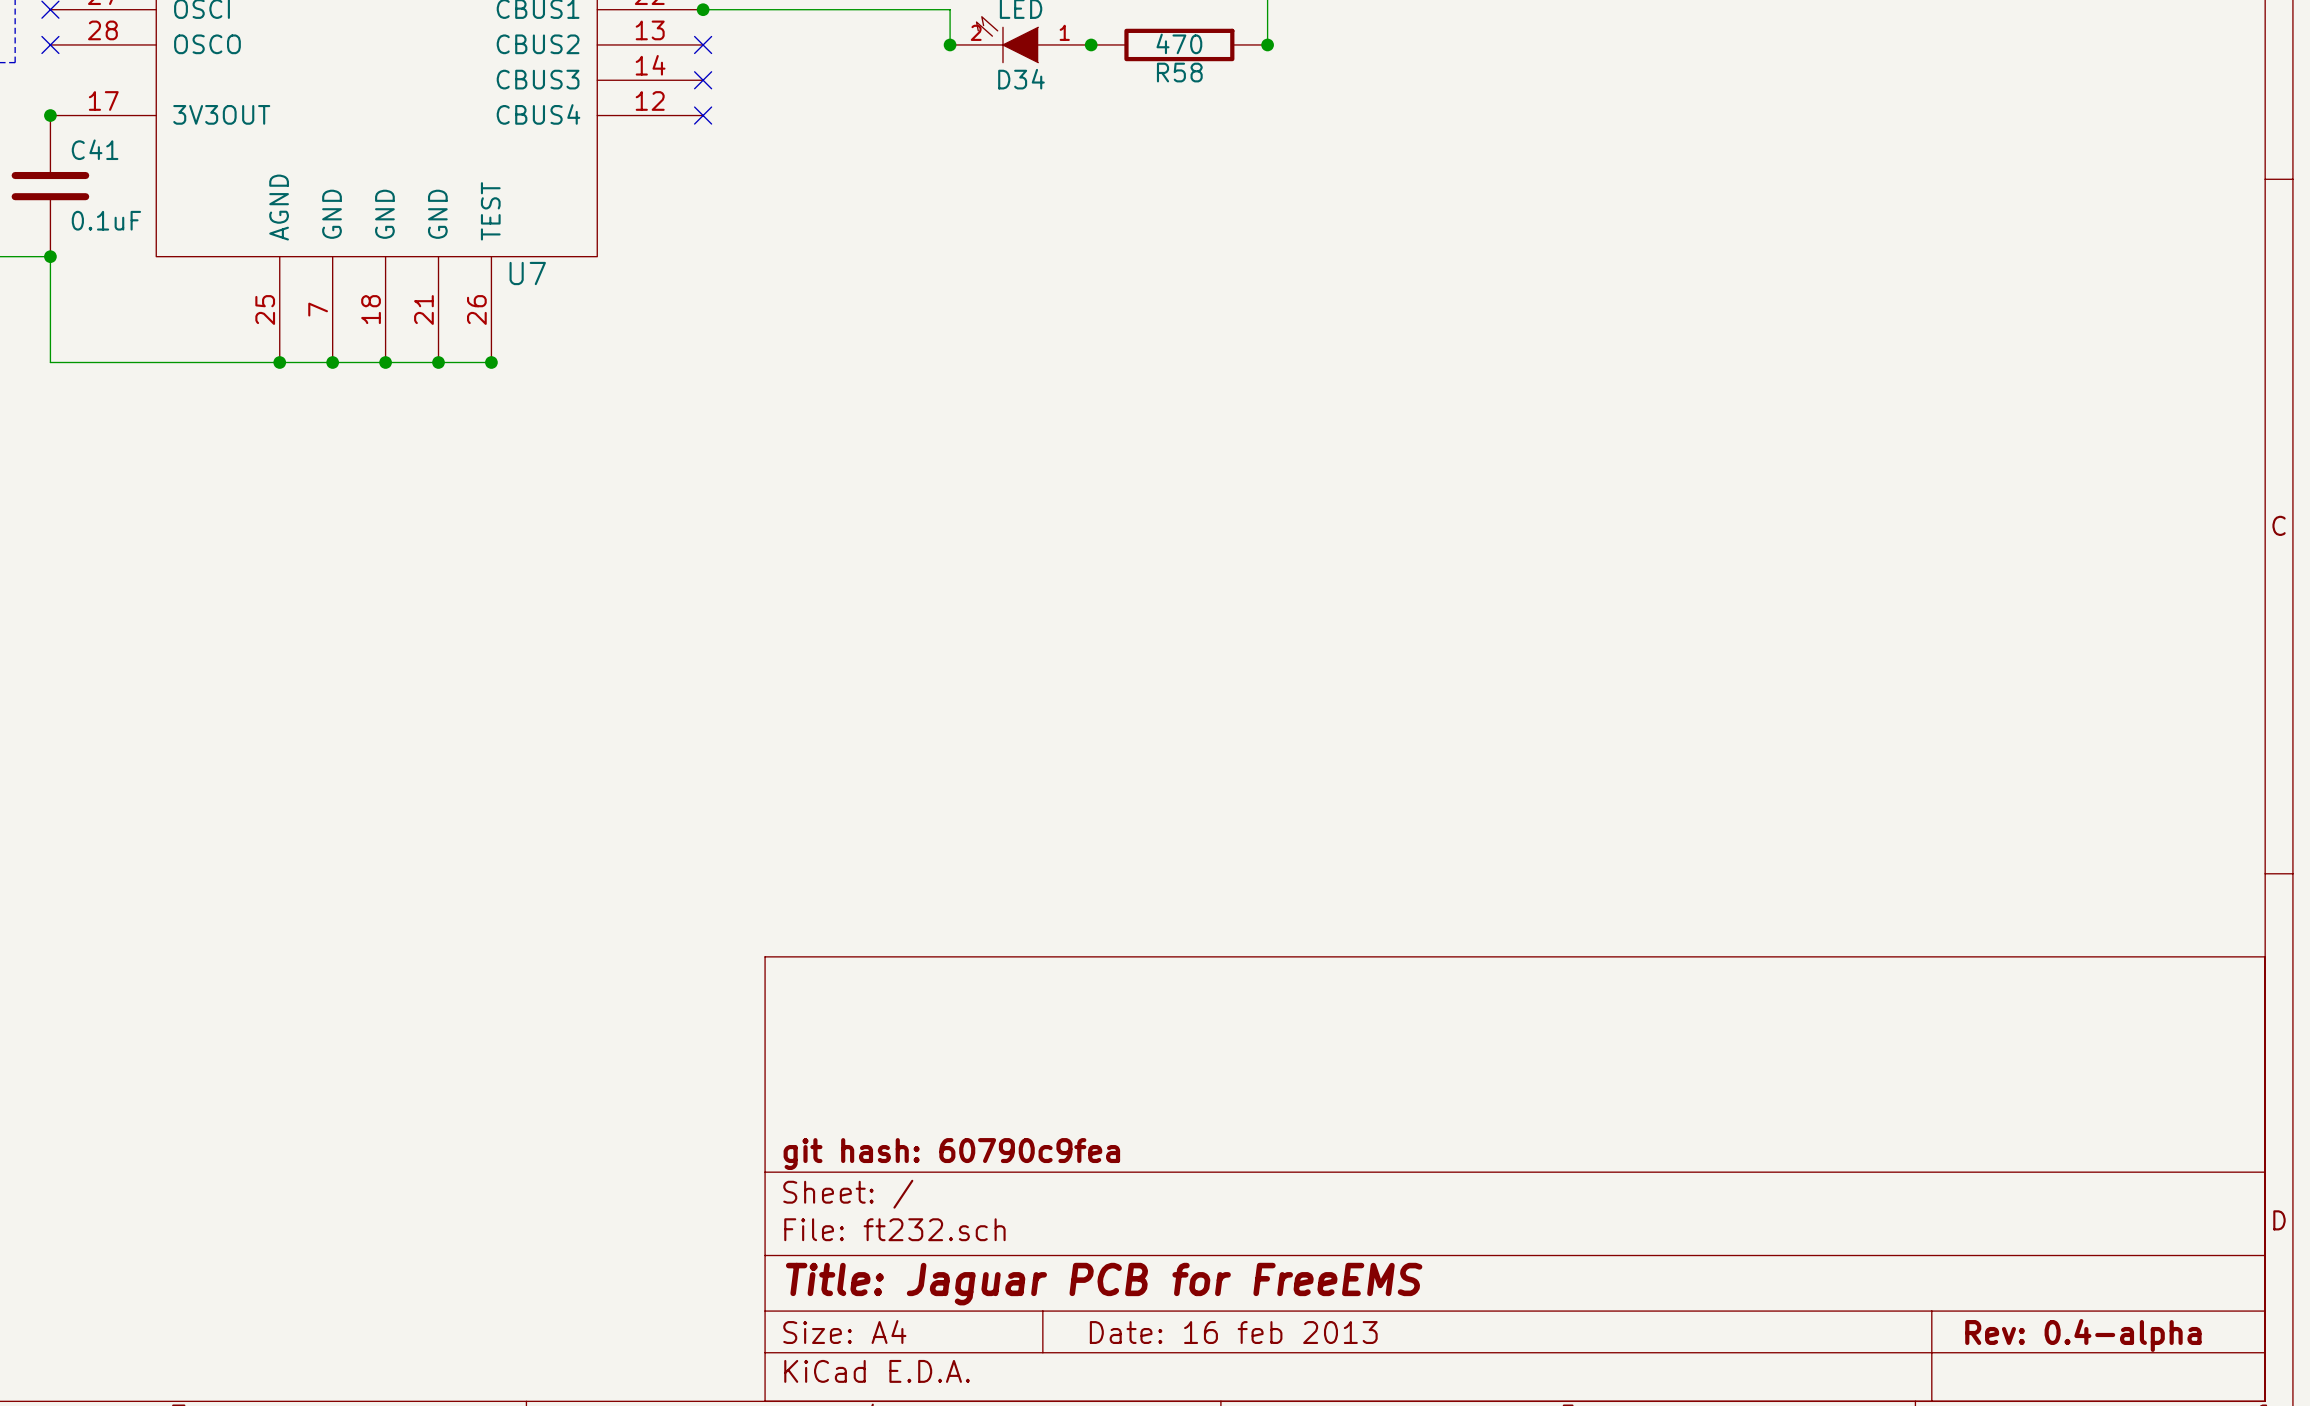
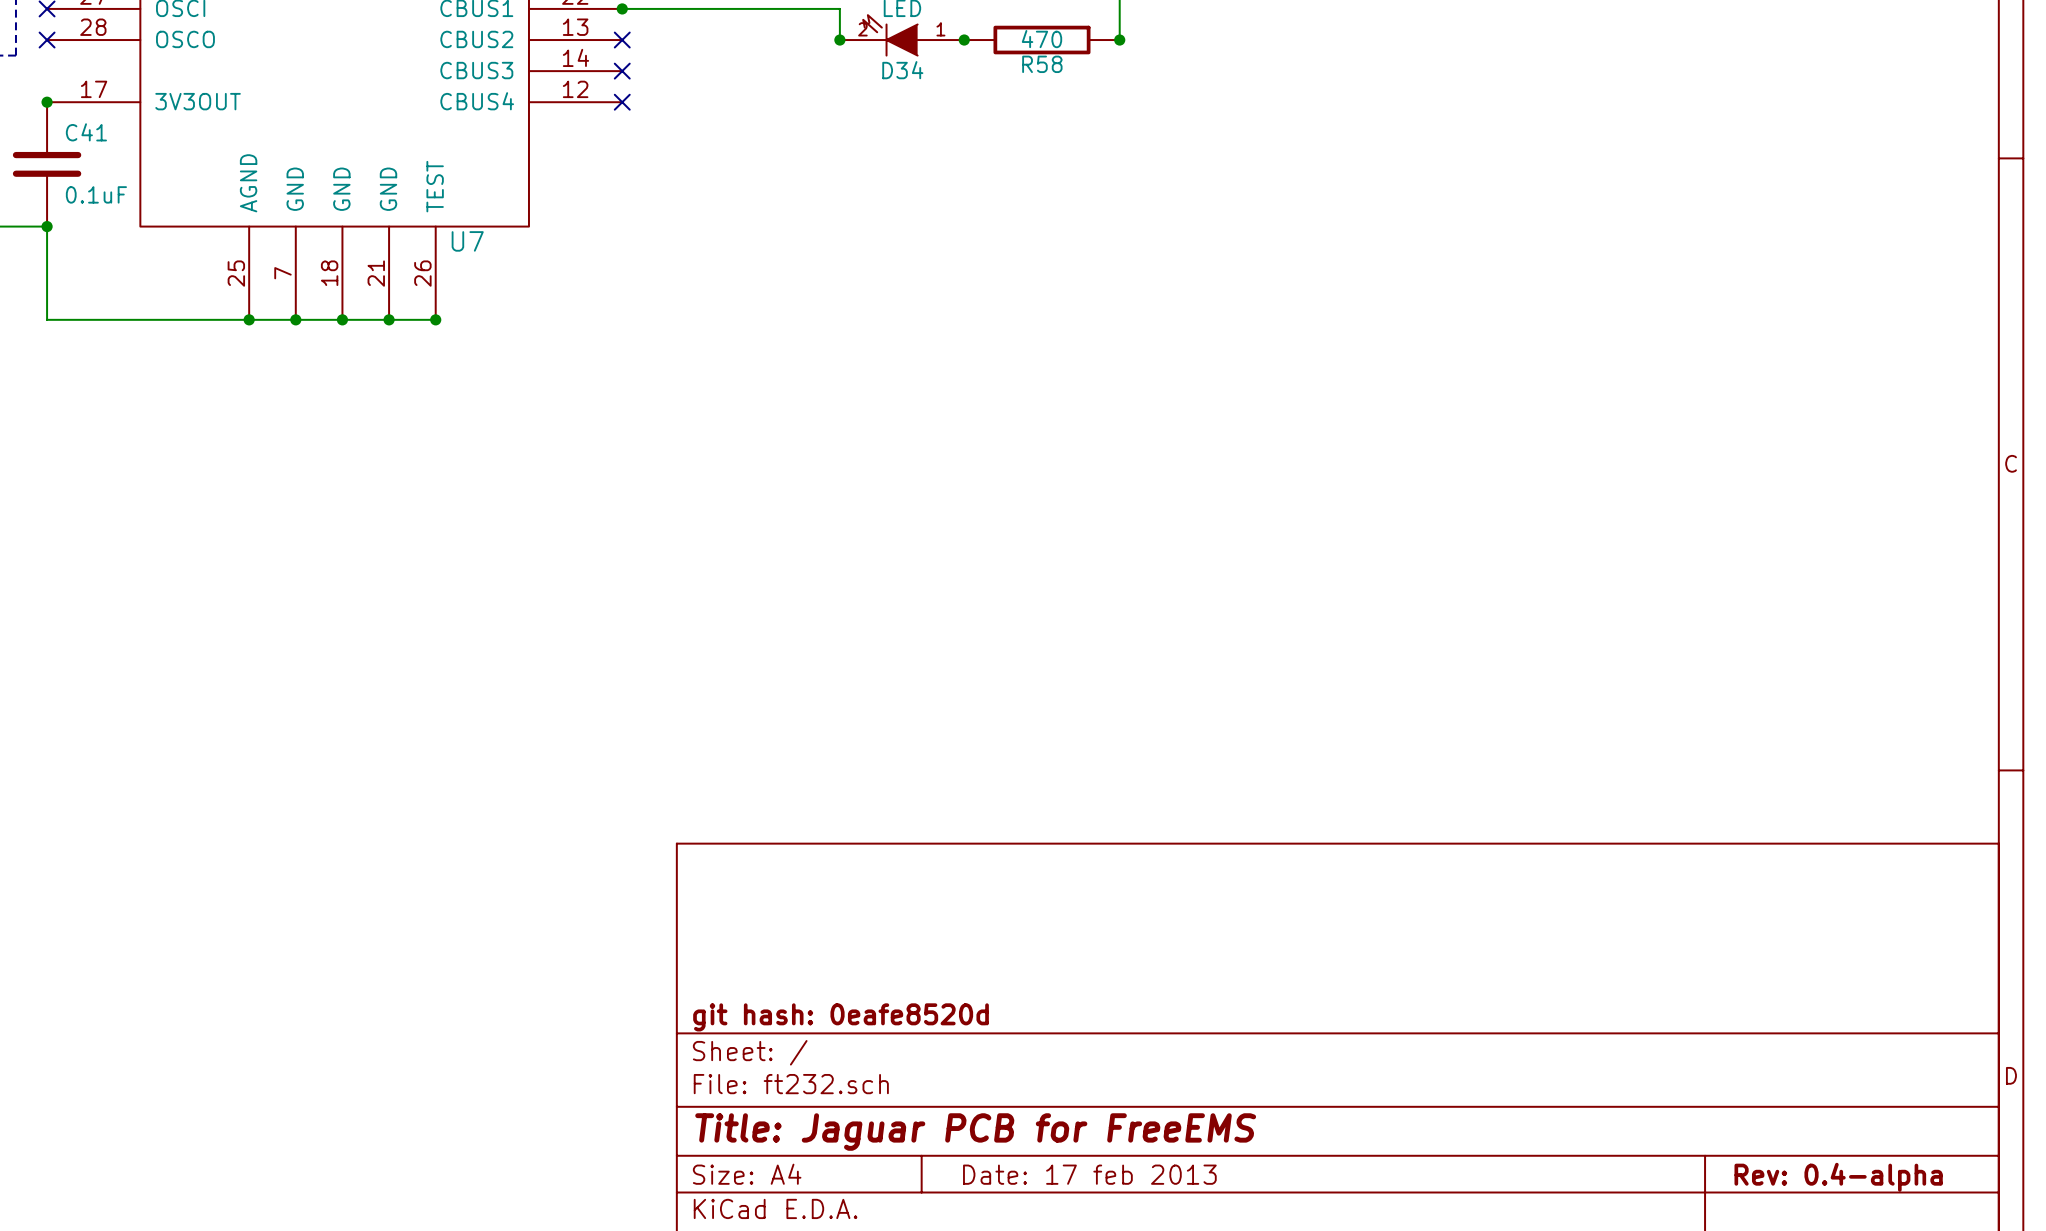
title block: git hash: 60790c9fea (951, 1154) -> git hash: 0eafe8520d (841, 1017)
title block: Date: 16 feb 2013 (1233, 1332) -> Date: 17 feb 2013 (1089, 1174)

